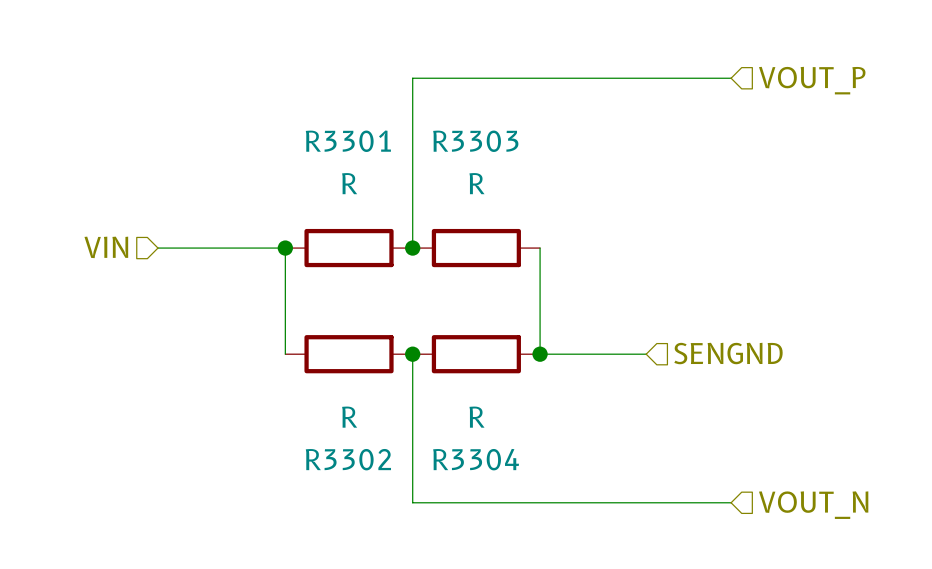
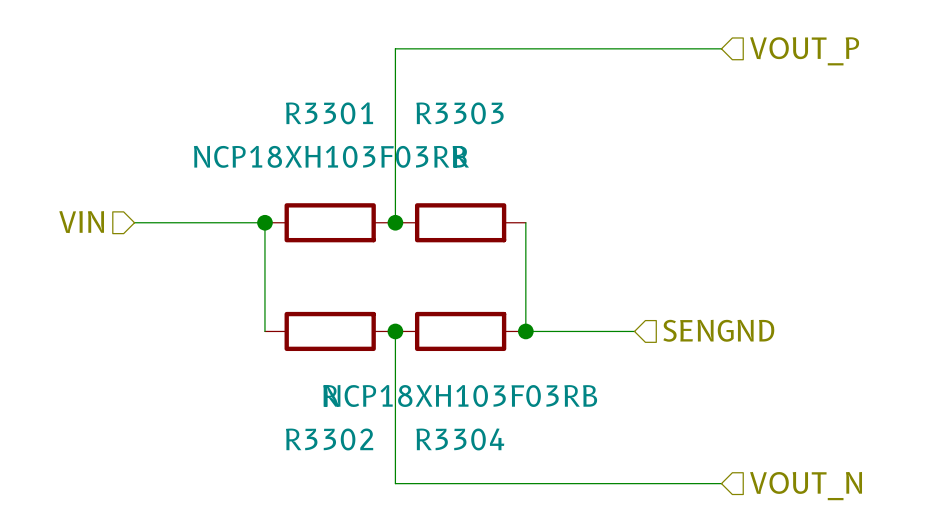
R3301 value: R (349, 183) -> NCP18XH103F03RB (330, 156)
R3304 value: R (477, 417) -> NCP18XH103F03RB (460, 395)

